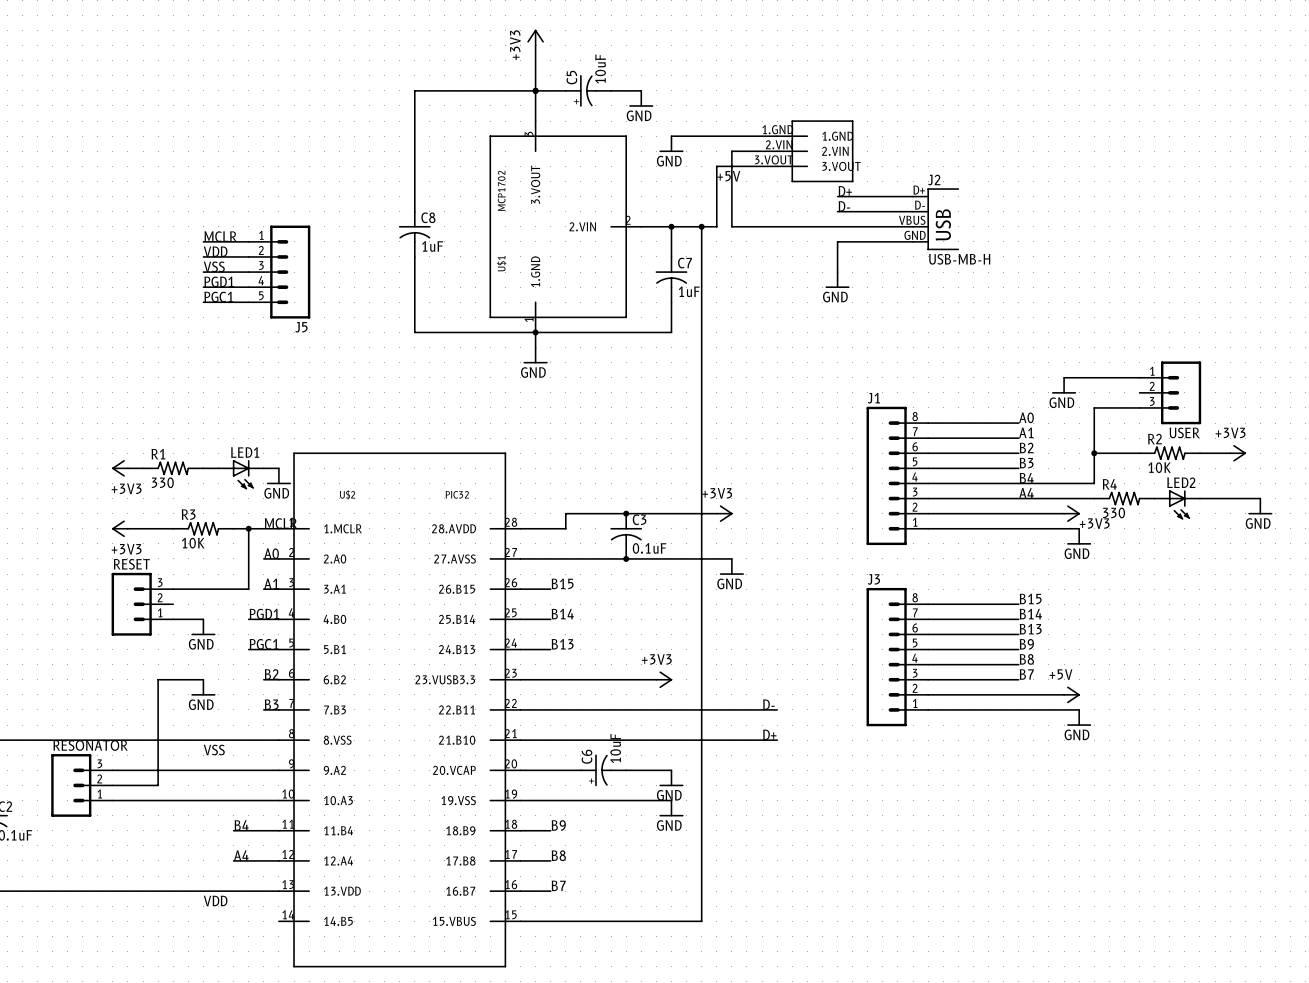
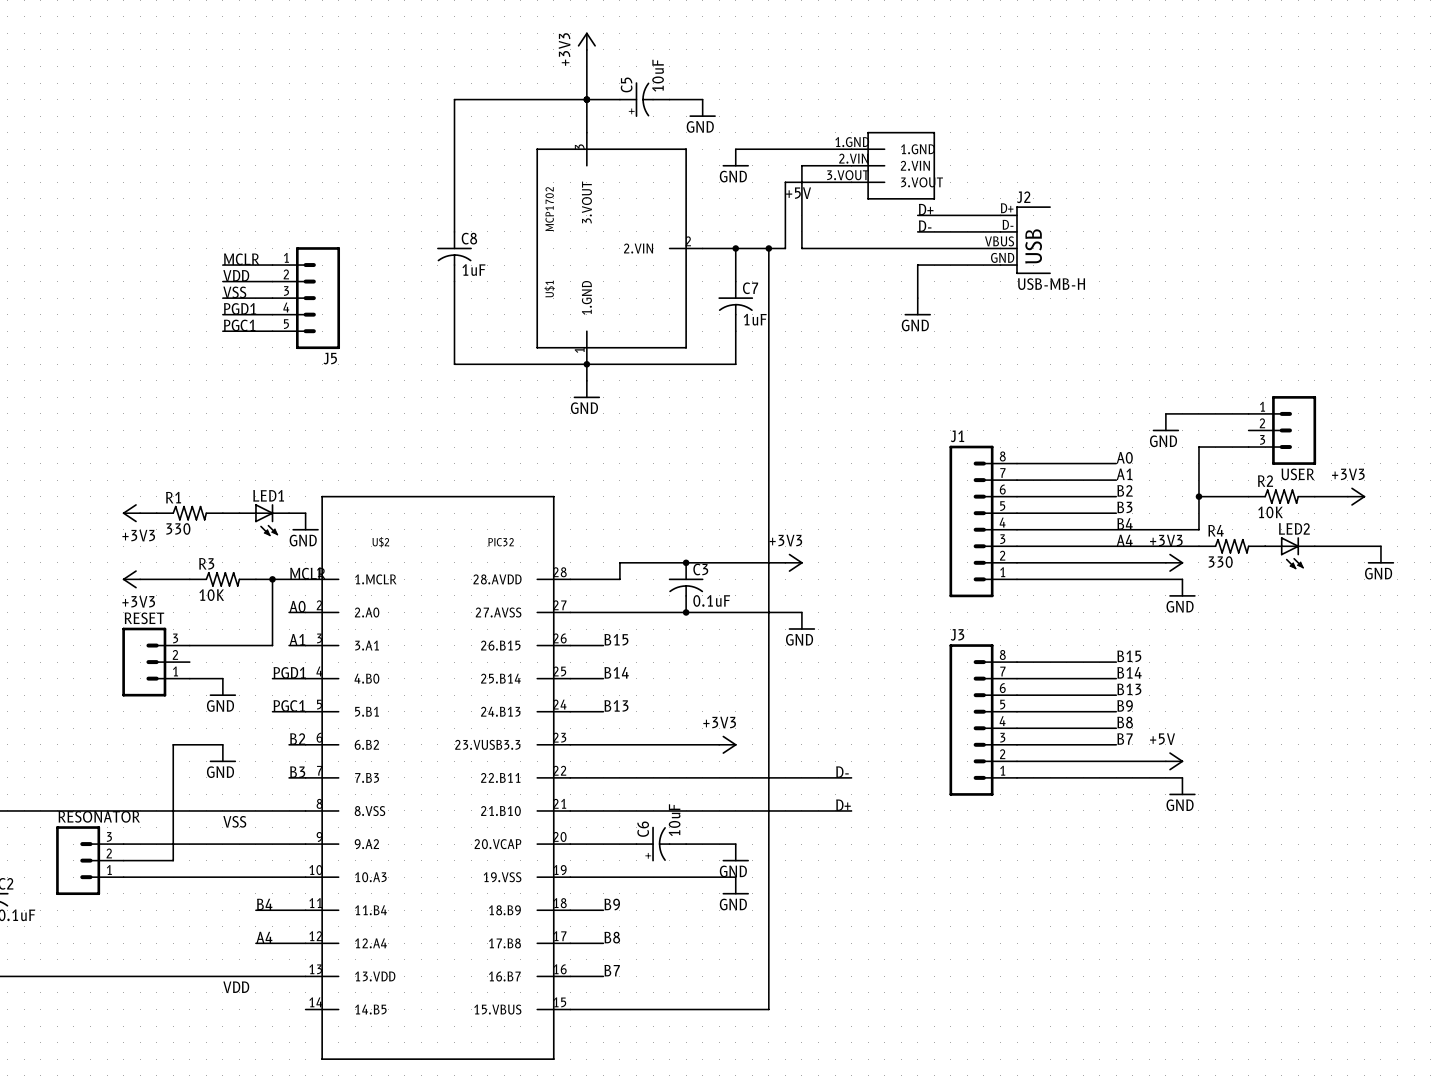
power symbol text position: +3V3 (1094, 523) -> +3V3 (1166, 540)

